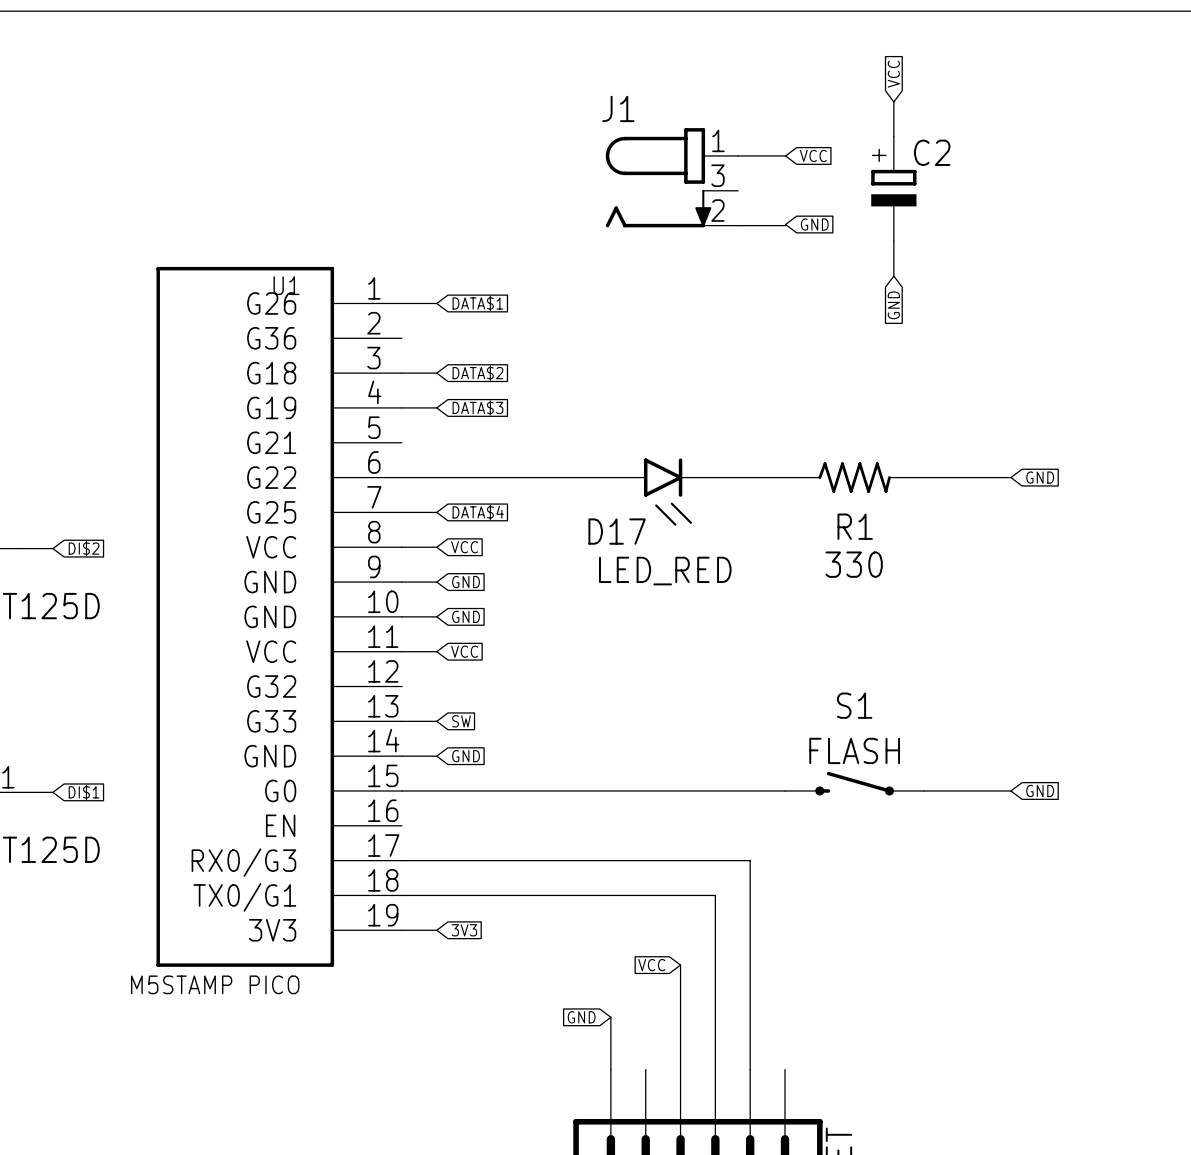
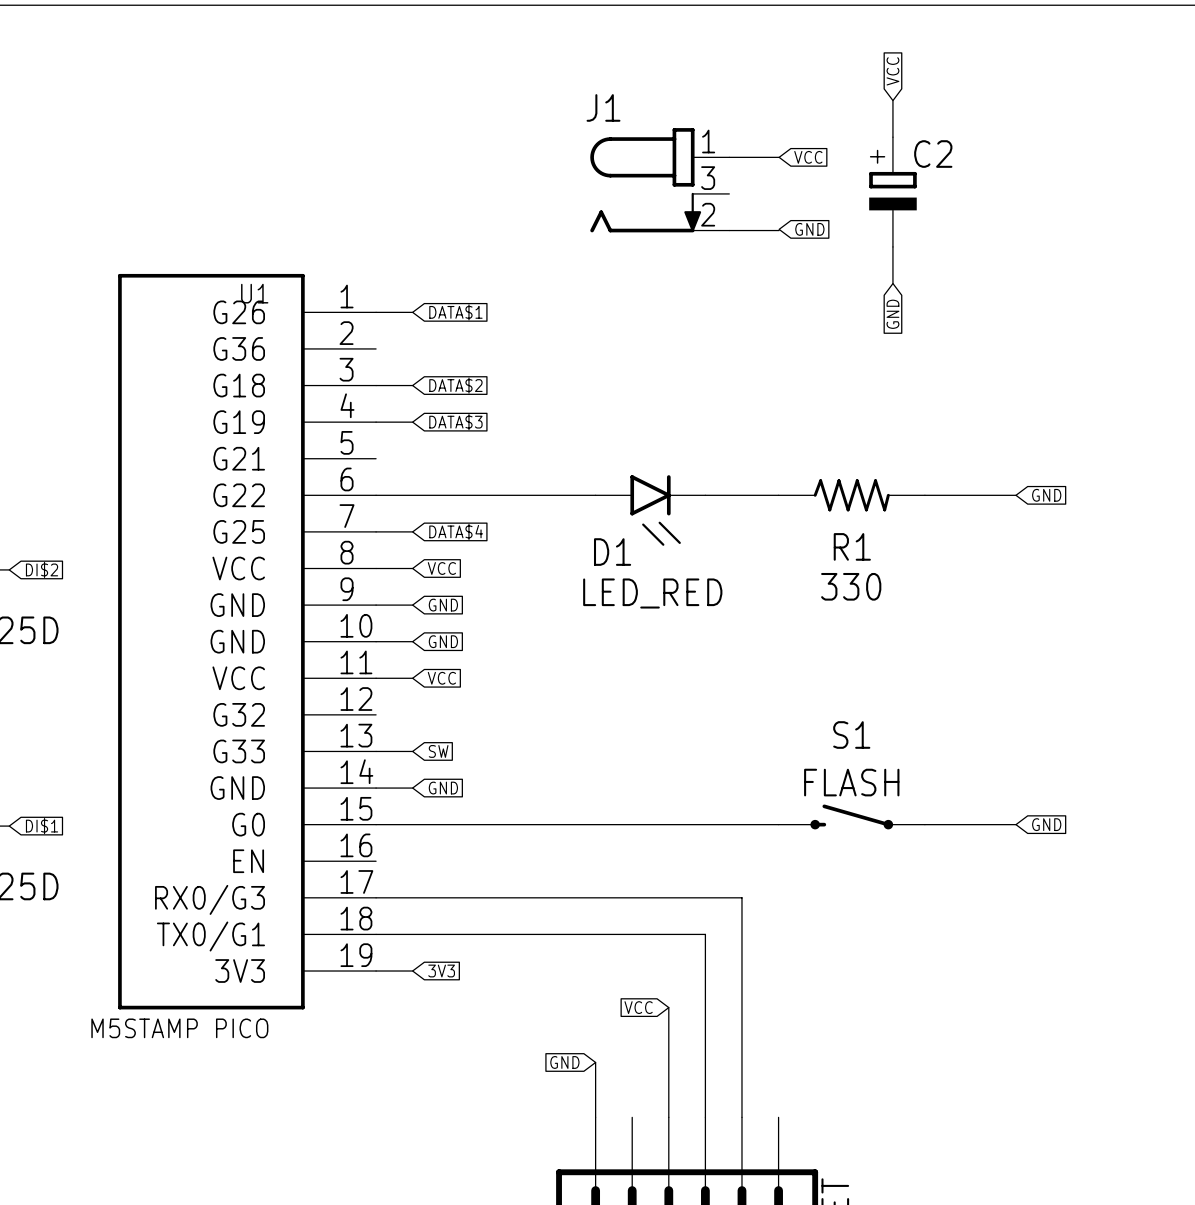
D17 name: D17 (617, 531) -> D1 (612, 552)

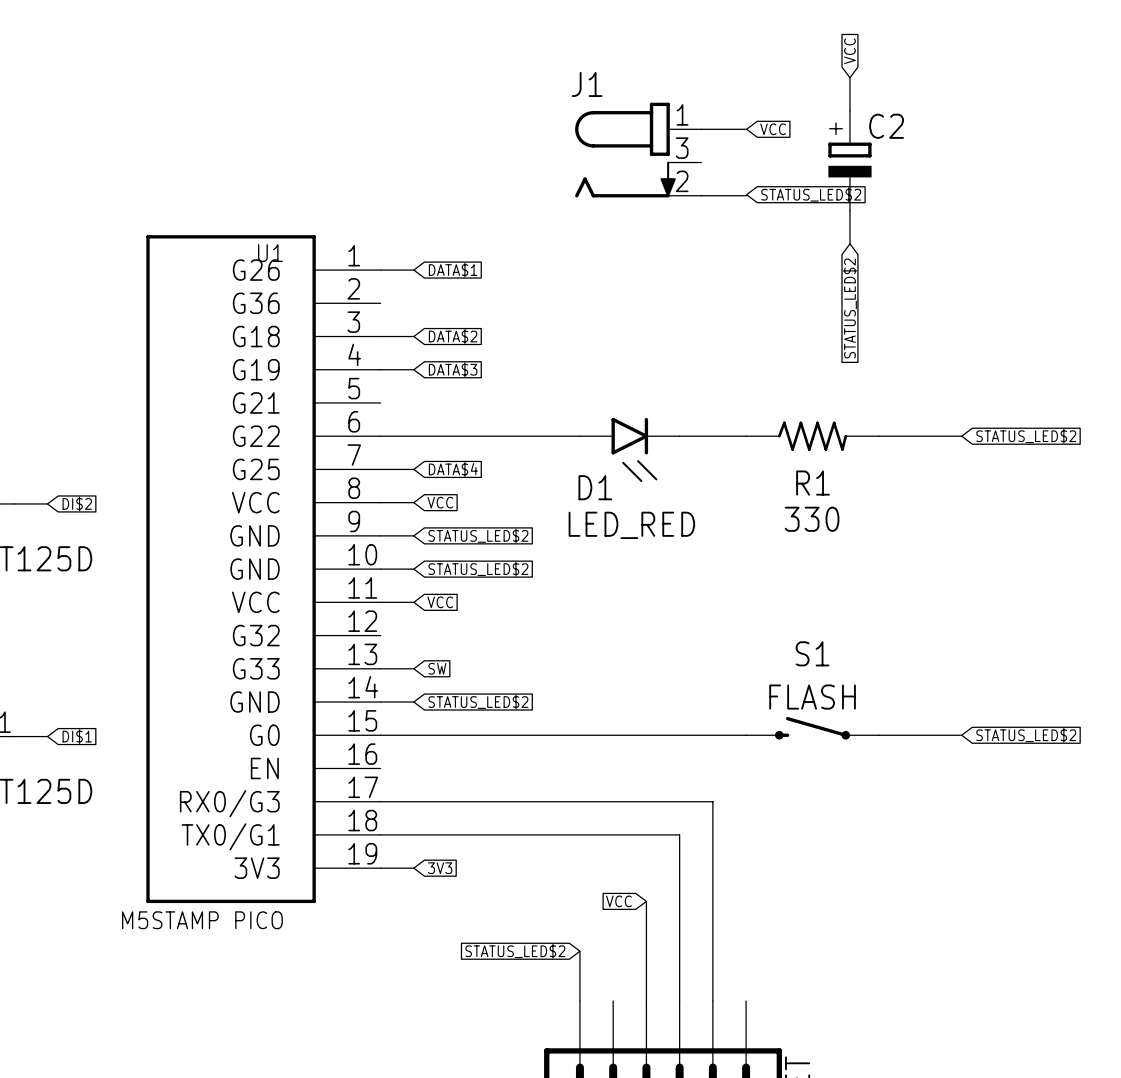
global label: GND (809, 229) -> STATUS_LED$2 (811, 194)
global label: GND (892, 314) -> STATUS_LED$2 (849, 308)
global label: GND (1046, 495) -> STATUS_LED$2 (1026, 436)
global label: GND (443, 605) -> STATUS_LED$2 (478, 535)
global label: GND (443, 641) -> STATUS_LED$2 (478, 569)
global label: GND (443, 788) -> STATUS_LED$2 (478, 702)
global label: GND (1046, 824) -> STATUS_LED$2 (1026, 735)
global label: GND (564, 1062) -> STATUS_LED$2 (515, 951)

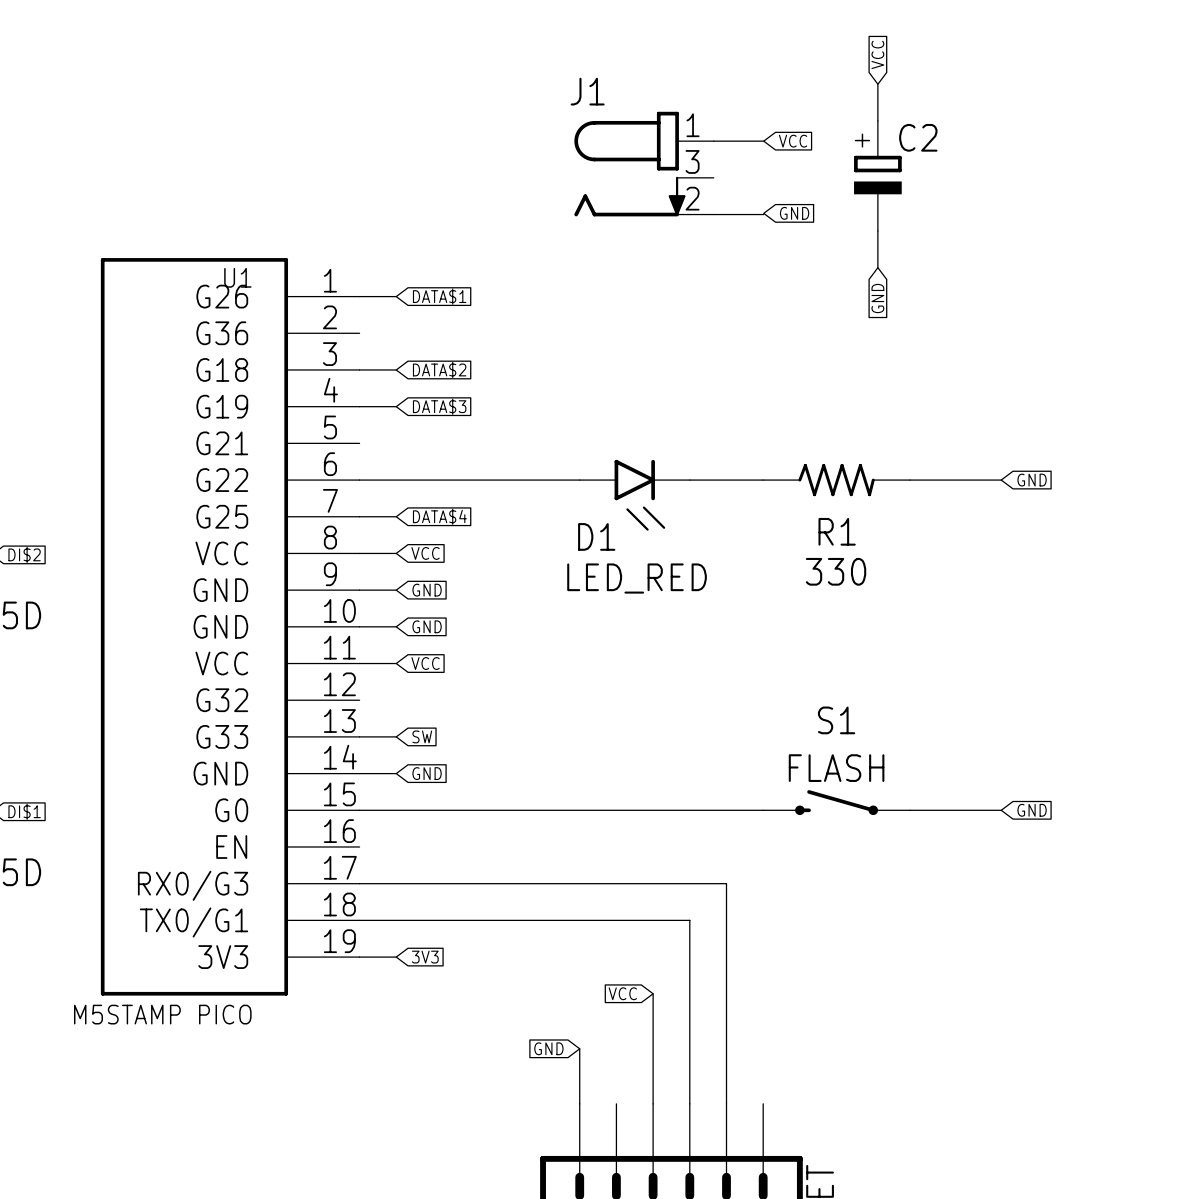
global label: STATUS_LED$2 (811, 194) -> GND (794, 213)
global label: STATUS_LED$2 (849, 308) -> GND (877, 298)
global label: STATUS_LED$2 (1026, 436) -> GND (1032, 480)
global label: STATUS_LED$2 (478, 535) -> GND (427, 590)
global label: STATUS_LED$2 (478, 569) -> GND (427, 626)
global label: STATUS_LED$2 (478, 702) -> GND (427, 773)
global label: STATUS_LED$2 (1026, 735) -> GND (1032, 810)
global label: STATUS_LED$2 (515, 951) -> GND (548, 1048)

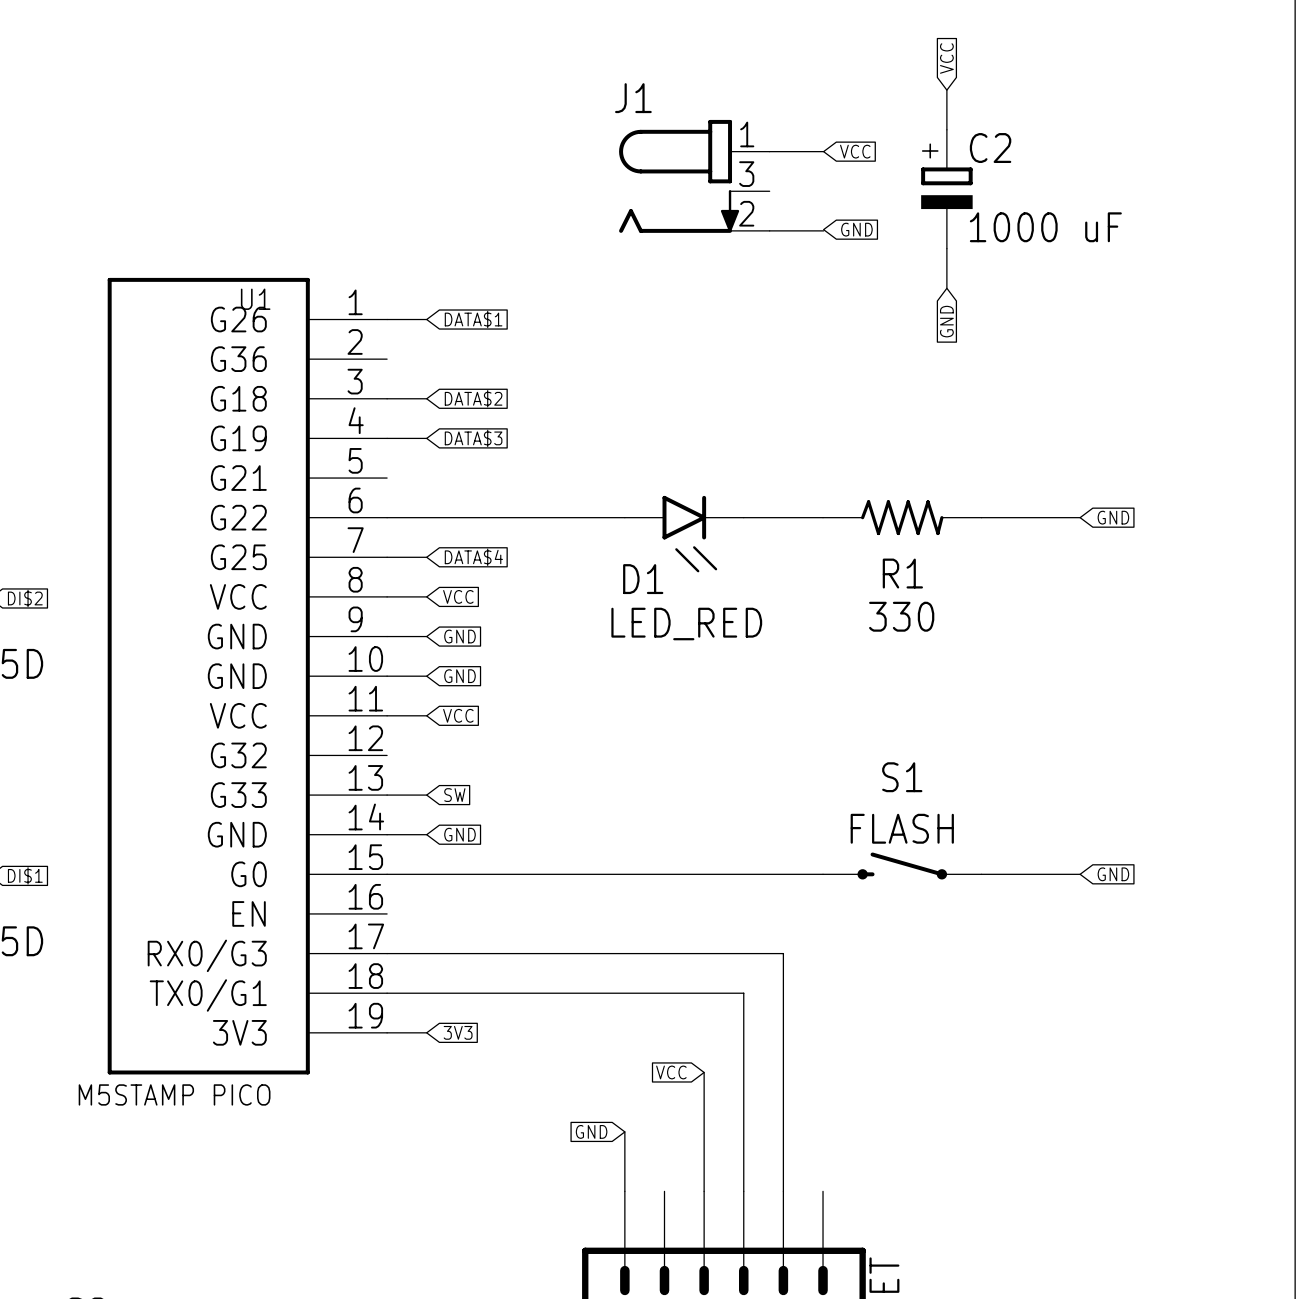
C2 value: none -> 1000 uF (1045, 227)

